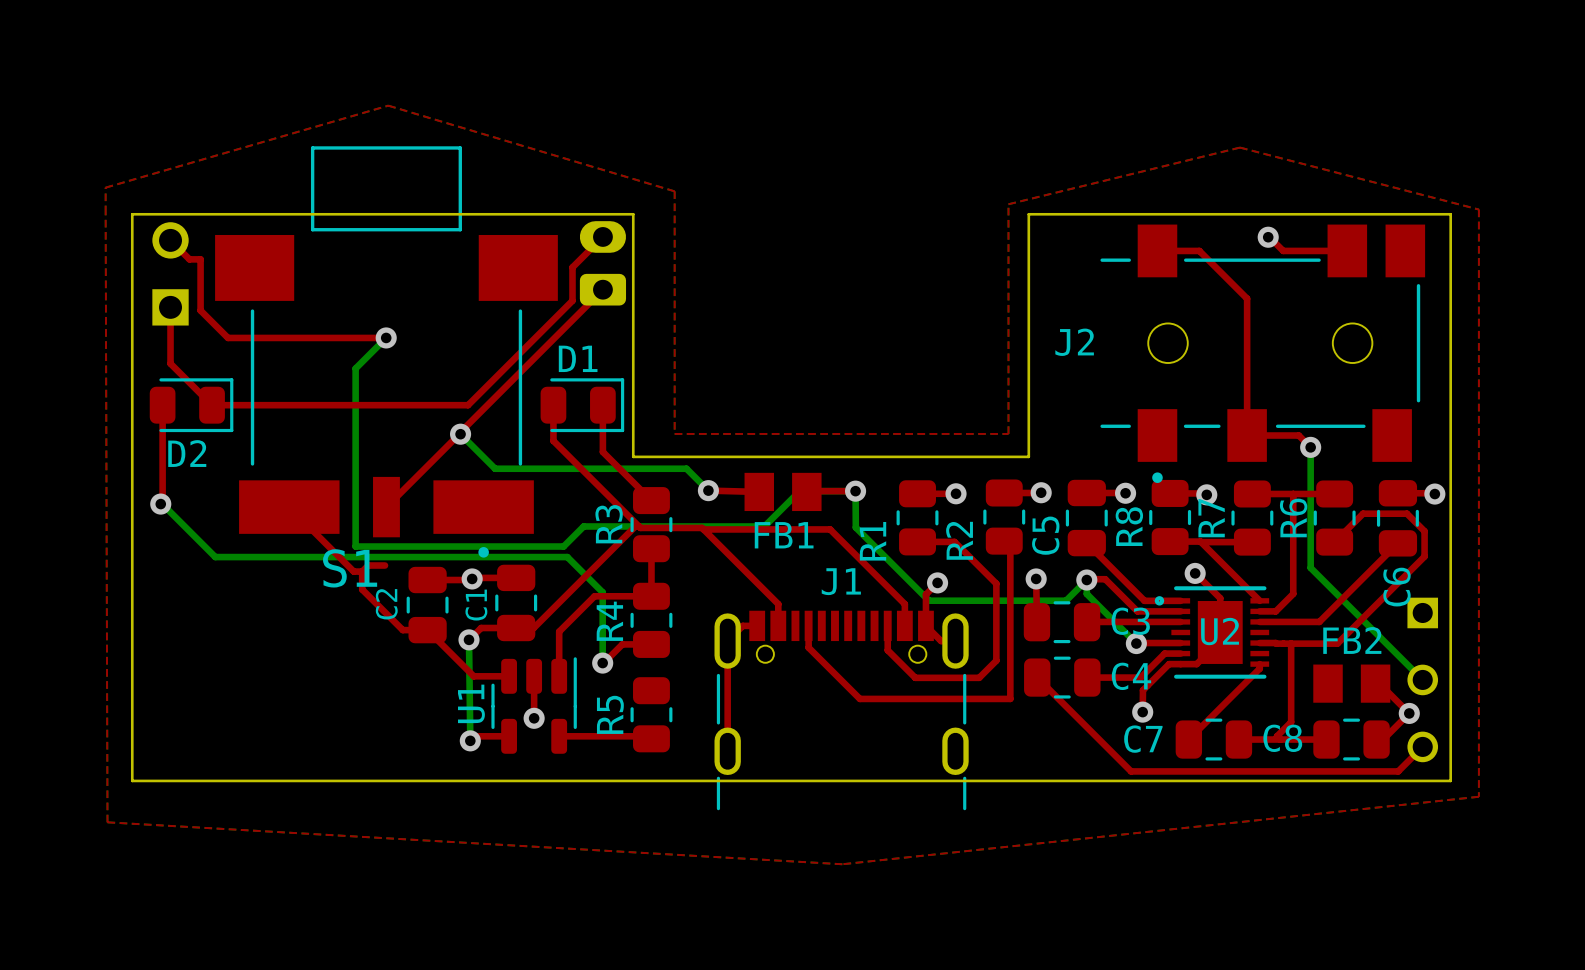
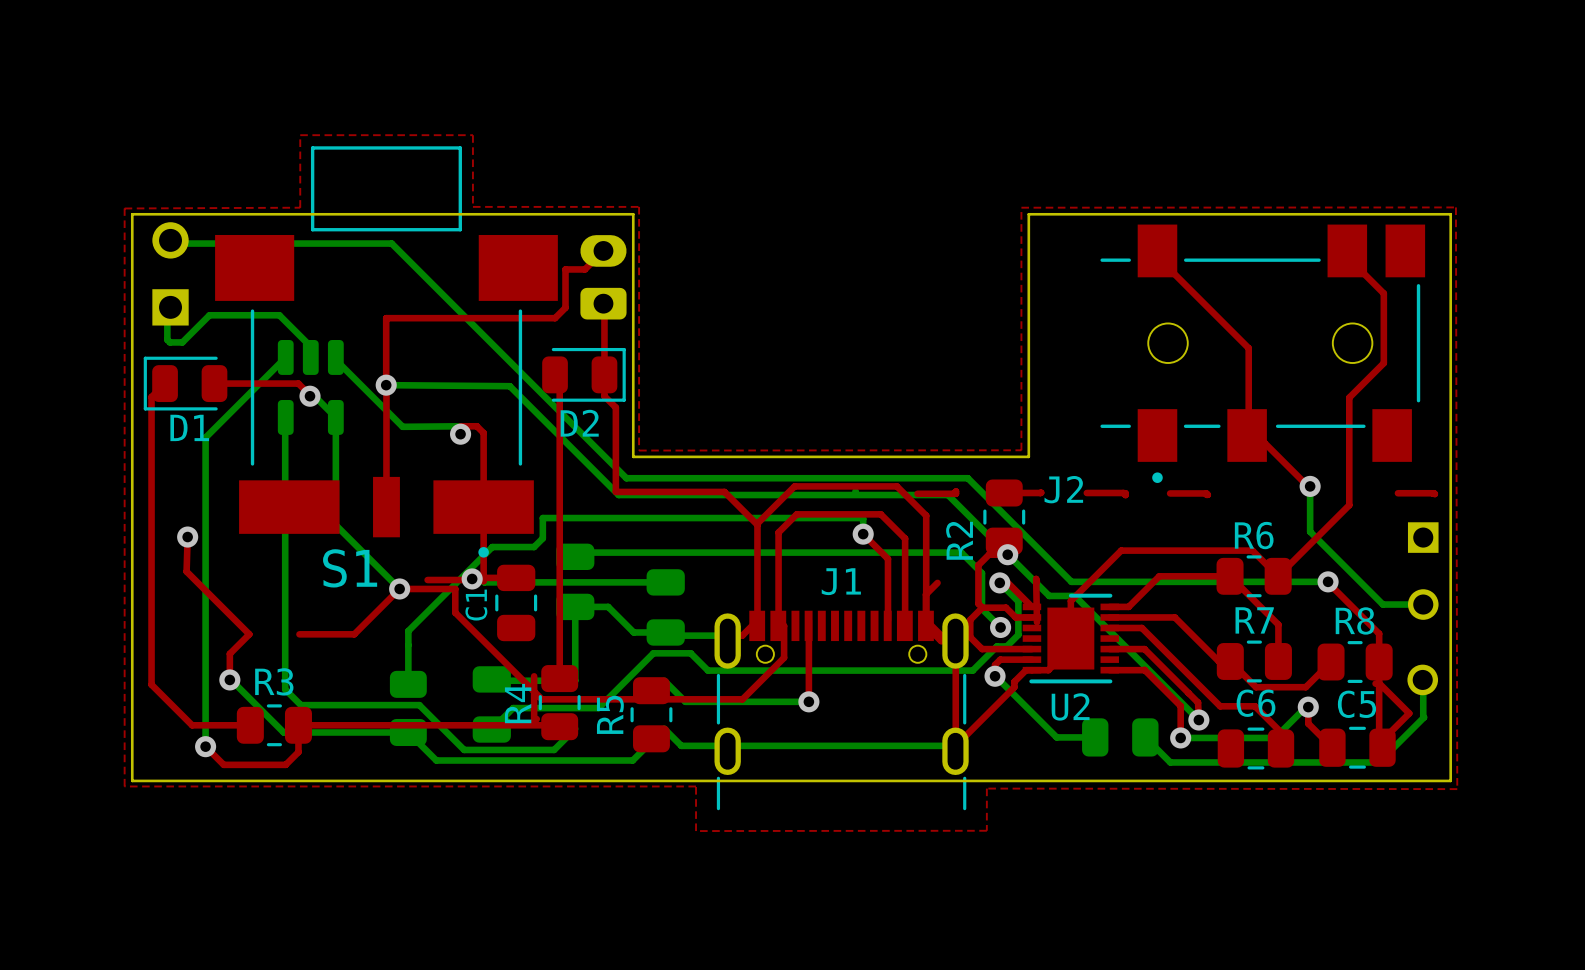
top zone outline: (388, 105) (105, 187) (107, 822) (842, 864) (1478, 796) (1478, 209) (1240, 147) (1008, 204) (1008, 433) (674, 433) (674, 191) (388, 105) -> (300, 135) (300, 207) (124, 208) (124, 786) (696, 786) (696, 831) (986, 830) (986, 788) (1457, 789) (1455, 207) (1021, 207) (1021, 450) (639, 450) (639, 206) (472, 206) (472, 135) (300, 135)
top track: (602, 236) (572, 267) (572, 300) (565, 307) -> (603, 250) (584, 269) (565, 269) (565, 307)
part position: (602, 236) -> (603, 250)
via: (1268, 237) -> none
top track: (1269, 237) (1268, 235) (1283, 250) (1347, 250) -> none
top track: (170, 240) (189, 259) (200, 259) (200, 310) (228, 337) (386, 337) -> none
bottom track: none -> (167, 243) (391, 243) (626, 478) (967, 478) (1071, 581) (1328, 581)
top track: (1157, 250) (1199, 250) (1247, 298) (1247, 435) (1298, 435) (1310, 447) -> none
top track: none -> (1159, 258) (1248, 348) (1248, 443) (1264, 443) (1310, 488) (1308, 486)
top track: none -> (1348, 258) (1383, 293) (1383, 363) (1349, 397) (1349, 505) (1278, 576) (1252, 550) (1121, 550) (1070, 600) (1070, 647) (1048, 670) (1026, 670) (1014, 681) (1014, 687) (955, 745) (955, 635) (941, 635) (926, 620) (926, 515) (896, 486) (794, 486) (757, 523) (757, 620) (742, 635) (727, 635)
part position: (602, 289) -> (603, 303)
top track: (602, 290) (460, 434) -> none
top track: none -> (603, 303) (604, 396) (615, 407) (615, 491) (724, 491) (757, 524)
top track: (170, 307) (170, 363) (212, 405) (468, 405) (555, 318) -> (386, 337) (386, 318) (555, 318)
bottom track: none -> (167, 310) (167, 339) (169, 342) (182, 342) (209, 315) (279, 315) (310, 346) (310, 357)
bottom track: (386, 337) (355, 368) (355, 546) (563, 546) (583, 526) (764, 526) (799, 491) (855, 491) (855, 527) (928, 600) (1066, 600) (1086, 580) (1086, 593) (1136, 643) -> none
via position: (386, 337) -> (386, 385)
top track: none -> (386, 339) (386, 385)
J2 name position: J2 (1074, 342) -> J2 (1063, 489)
bottom track: none -> (285, 357) (205, 437) (205, 746)
bottom track: none -> (335, 357) (335, 359) (402, 426) (461, 426)
top track: none -> (555, 374) (559, 379) (559, 678)
top track: none -> (165, 383) (151, 397) (151, 684) (192, 725) (250, 725)
bottom track: none -> (387, 386) (509, 386) (618, 495) (948, 495) (1007, 554)
top track: none -> (221, 390) (214, 383) (298, 383) (310, 395)
bottom track: none -> (310, 396) (314, 396) (335, 417) (335, 525) (399, 589)
via: none -> (310, 396)
top track: (162, 405) (162, 502) (160, 504) -> none
D2 position: (191, 405) -> (583, 374)
top track: (553, 405) (553, 440) (640, 527) (702, 527) (778, 604) (778, 625) -> none
D1 rotation: 0° (582, 405) -> 180° (185, 383)
D1 position: (582, 405) -> (185, 383)
top track: (602, 405) (602, 451) (651, 500) -> none
bottom track: none -> (285, 417) (285, 689) (300, 705) (419, 705) (464, 749) (554, 749) (575, 728)
top track: none -> (460, 426) (476, 426) (483, 433) (483, 581)
top track: (460, 434) (386, 507) -> (386, 385) (386, 507)
bottom track: (460, 434) (495, 468) (686, 468) (708, 490) -> none
bottom track: (1310, 447) (1310, 567) (1422, 679) -> none
via position: (1310, 447) -> (1310, 486)
bottom track: none -> (1310, 486) (1310, 531) (1382, 604) (1423, 604)
via: (708, 490) -> none
top track: (759, 491) (708, 490) (708, 492) -> none
FB1: (783, 491) -> none
top track: (855, 491) (806, 491) -> none
via position: (855, 491) -> (863, 534)
via: (1041, 492) -> none
via: (956, 493) -> none
via: (1125, 493) -> none
top track: (1252, 493) (1334, 493) -> none
top track: (1293, 493) (1293, 593) (1275, 611) (1259, 611) -> none
via: (1206, 494) -> none
via: (1434, 494) -> none
via position: (160, 504) -> (187, 537)
bottom track: (162, 504) (160, 502) (215, 557) (567, 557) (602, 592) (602, 663) -> none
top track: (289, 507) (353, 571) (362, 571) -> none
R1 side: top (917, 517) -> bottom (408, 708)
R8 rotation: 0° (1170, 517) -> 90° clockwise (1355, 662)
R8 position: (1170, 517) -> (1355, 662)
C5 rotation: 0° (1086, 518) -> 90° clockwise (1357, 747)
C5 position: (1086, 518) -> (1357, 747)
R7 rotation: 0° (1252, 518) -> 90° clockwise (1254, 661)
R7 position: (1252, 518) -> (1254, 661)
R6 rotation: 0° (1334, 518) -> 90° clockwise (1254, 576)
R6 position: (1334, 518) -> (1254, 576)
C6 rotation: 0° (1397, 518) -> 90° clockwise (1255, 748)
C6 position: (1397, 518) -> (1255, 748)
R3 rotation: 0° (651, 524) -> 90° clockwise (274, 725)
R3 position: (651, 524) -> (274, 725)
top track: (638, 526) (635, 526) (533, 628) (481, 628) (469, 640) -> none
top track: (703, 529) (830, 529) (904, 604) (904, 625) -> none
top track: none -> (863, 534) (887, 558) (887, 620)
bottom track: none -> (863, 534) (862, 518) (542, 518) (542, 538) (534, 547) (492, 547) (408, 631) (408, 684)
part: none -> (1423, 537)
top track: none -> (186, 539) (187, 537) (186, 571) (249, 634) (229, 653) (229, 679)
top track: (917, 541) (954, 541) (996, 583) (996, 660) (979, 677) (915, 677) (887, 650) (887, 625) -> none
top track: (1004, 541) (1010, 547) (1010, 698) (859, 698) (808, 647) (808, 625) -> none
top track: (1170, 541) (1200, 541) (1259, 600) -> none
top track: (1201, 542) (1252, 542) -> none
top track: (1334, 542) (1363, 513) (1406, 513) (1424, 531) (1424, 556) (1337, 643) (1259, 643) -> none
top track: (1086, 543) (1144, 600) (1180, 600) -> none
top track: (1397, 543) (1319, 621) (1259, 621) -> none
top track: (651, 548) (651, 596) (594, 596) (559, 631) (559, 676) -> none
top track: none -> (1007, 554) (988, 554) (978, 565) (978, 603) (982, 607)
bottom track: none -> (1007, 554) (1049, 595) (1074, 595) (1198, 720)
via: none -> (1007, 554)
bottom track: none -> (575, 556) (579, 552) (961, 552) (981, 573) (981, 608) (1000, 627)
top track: (385, 565) (368, 565) (362, 571) -> none
top track: (362, 571) (362, 589) (402, 630) (427, 630) (473, 676) (509, 676) -> none
top track: (1195, 573) (1220, 598) (1220, 640) (1196, 664) (1169, 664) (1142, 690) (1142, 712) (1142, 710) -> none
via: (1195, 573) -> none
via: (1036, 578) -> none
top track: (1086, 580) (1105, 579) (1137, 611) (1180, 611) -> none
via: (1086, 580) -> none
bottom track: none -> (483, 581) (665, 582)
part: none -> (575, 581)
via: none -> (1328, 581)
via: (937, 582) -> none
top track: none -> (999, 582) (1007, 582) (1031, 606)
bottom track: none -> (999, 582) (1018, 601) (1018, 634) (1006, 646) (996, 646) (972, 670) (708, 670) (690, 653) (653, 653) (598, 708) (513, 708) (491, 729)
via: none -> (999, 582)
top track: none -> (1328, 582) (1379, 633) (1379, 744) (1382, 747) (1382, 736)
U2 footprint: [1154, 586, 1270, 679] -> [1022, 593, 1119, 684]
C6 name position: C6 (1396, 587) -> C6 (1256, 703)
via: none -> (399, 588)
part footprint: [1407, 597, 1439, 629] -> [1407, 589, 1439, 620]
C2 side: top (427, 605) -> bottom (665, 607)
top track: none -> (1109, 606) (1128, 606) (1159, 576) (1230, 576) (1278, 624) (1278, 661)
top track: none -> (982, 607) (1005, 607) (1015, 617) (1031, 617)
top track: none -> (982, 607) (970, 619) (970, 637) (982, 649) (1031, 649)
top track: none -> (1109, 617) (1174, 617) (1218, 661) (1230, 661) (1256, 687) (1305, 687) (1331, 662)
R4 position: (651, 620) -> (559, 702)
top track: none -> (808, 620) (808, 701)
top track: none -> (905, 620) (905, 538) (880, 514) (796, 514) (778, 532) (778, 620) (784, 626) (784, 657) (742, 699) (541, 699) (455, 612) (455, 588) (399, 588) (354, 634) (299, 634)
top track: (1087, 621) (1180, 621) -> none
C3: (1062, 622) -> none
top track: (757, 625) (742, 625) (727, 641) (727, 751) -> none
via: none -> (1000, 627)
top track: none -> (1109, 628) (1141, 628) (1220, 706) (1255, 706) (1281, 732) (1281, 748)
U2 name position: U2 (1220, 631) -> U2 (1070, 706)
bottom track: none -> (727, 635) (668, 635) (665, 632) (633, 632) (608, 606) (575, 606) (575, 680) (491, 679)
bottom track: (469, 639) (469, 740) -> none
via: (469, 639) -> none
via: (1136, 643) -> none
top track: (1180, 643) (1139, 643) (1136, 645) (1136, 643) (1138, 643) -> none
top track: (1291, 643) (1291, 722) (1277, 736) (1280, 739) -> none
top track: (651, 644) (622, 644) (603, 663) -> none
top track: none -> (1109, 649) (1144, 649) (1198, 702) (1198, 720) (1198, 712)
top track: (1180, 653) (1164, 653) (1140, 677) (1087, 677) -> none
top track: none -> (1031, 659) (1000, 659) (995, 664) (995, 676)
via: (602, 663) -> none
top track: (1259, 664) (1259, 668) (1188, 739) -> none
top track: none -> (1144, 669) (1180, 706) (1180, 737)
top track: none -> (1109, 670) (1144, 670)
bottom track: none -> (1423, 671) (1424, 717) (1378, 762) (1170, 762) (1145, 737)
bottom track: none -> (995, 676) (1056, 737) (1095, 737)
via: none -> (995, 676)
top track: (1037, 677) (1131, 771) (1398, 771) (1422, 746) -> none
C4: (1062, 677) -> none
via: none -> (229, 679)
bottom track: none -> (231, 679) (229, 678) (283, 732) (408, 732) (436, 760) (632, 760) (664, 728) (681, 745) (955, 745)
bottom track: none -> (664, 680) (685, 701) (808, 701)
FB2: (1351, 683) -> none
via: none -> (808, 701)
part: none -> (491, 704)
U1 side: top (534, 705) -> bottom (310, 387)
bottom track: none -> (1307, 705) (1308, 707) (1305, 707) (1275, 737) (1180, 737)
top track: none -> (1308, 707) (1308, 723) (1332, 747)
via: none -> (1308, 707)
via: (1142, 712) -> none
via: (1409, 713) -> none
via: (534, 718) -> none
via: none -> (1198, 720)
top track: none -> (559, 726) (298, 725) (298, 752) (285, 764) (223, 764) (205, 746)
top track: (509, 736) (474, 736) (470, 740) -> none
top track: (559, 736) (648, 736) (651, 738) -> none
part: none -> (1120, 737)
via: none -> (1180, 737)
C7: (1213, 739) -> none
top track: (1238, 739) (1326, 739) -> none
C8: (1351, 739) -> none
via: (470, 740) -> none
via: none -> (205, 746)
part: (1422, 746) -> none

